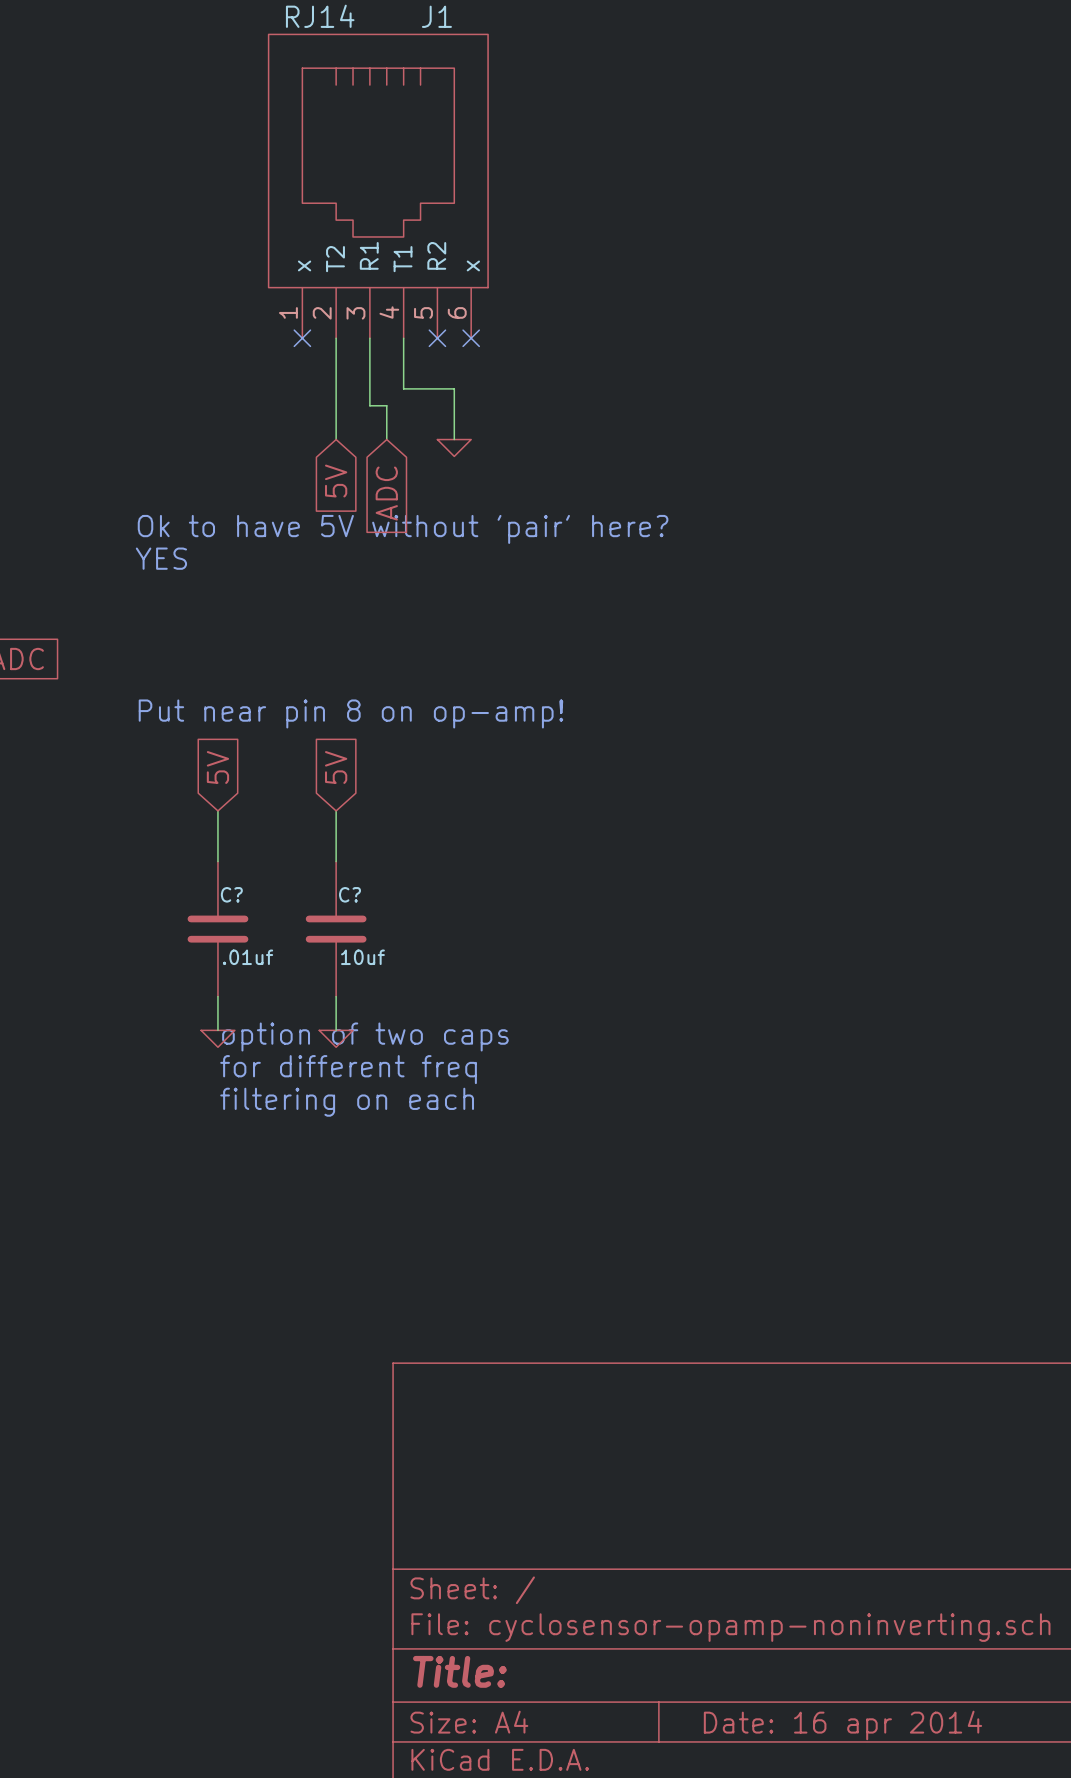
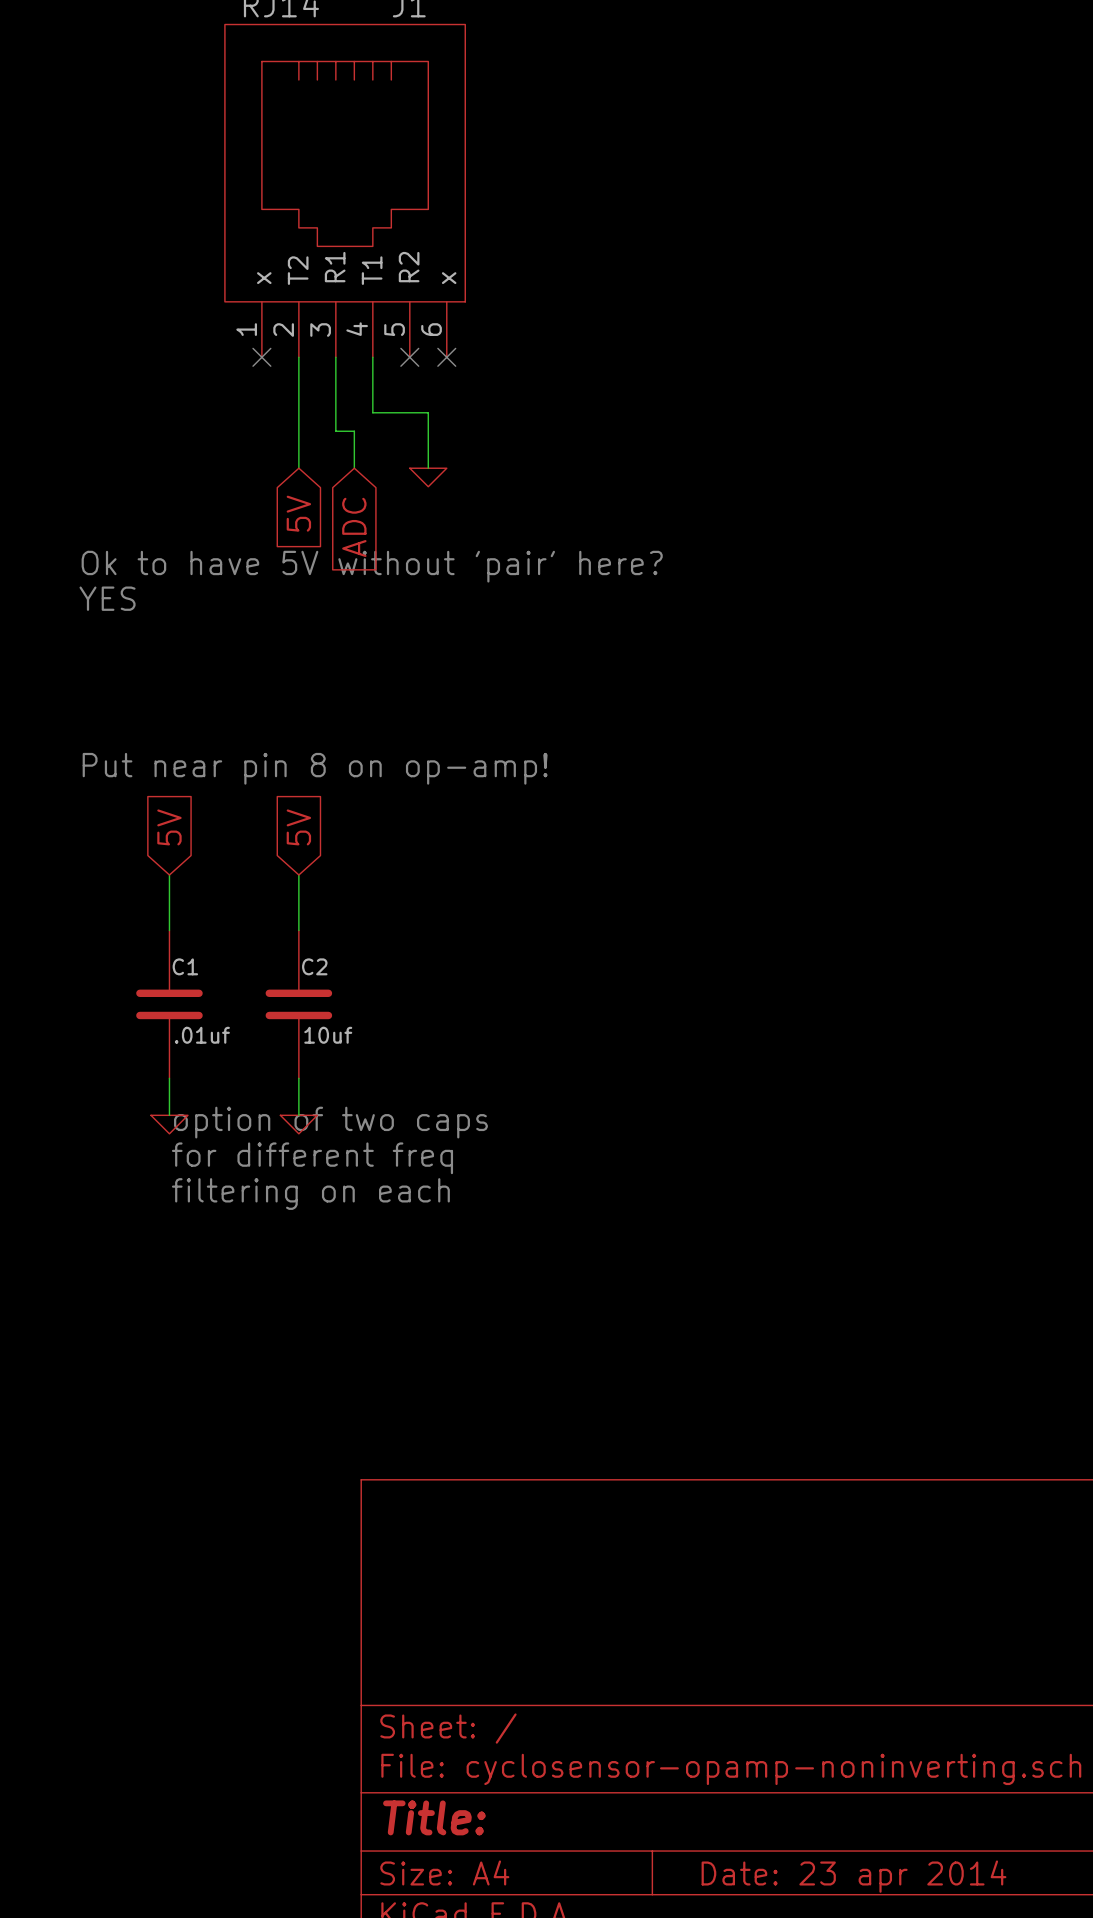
C? name: C? (231, 894) -> C1 (185, 966)
C? name: C? (350, 894) -> C2 (314, 966)
title block: Date: 16 apr 2014 (842, 1725) -> Date: 23 apr 2014 (853, 1876)

